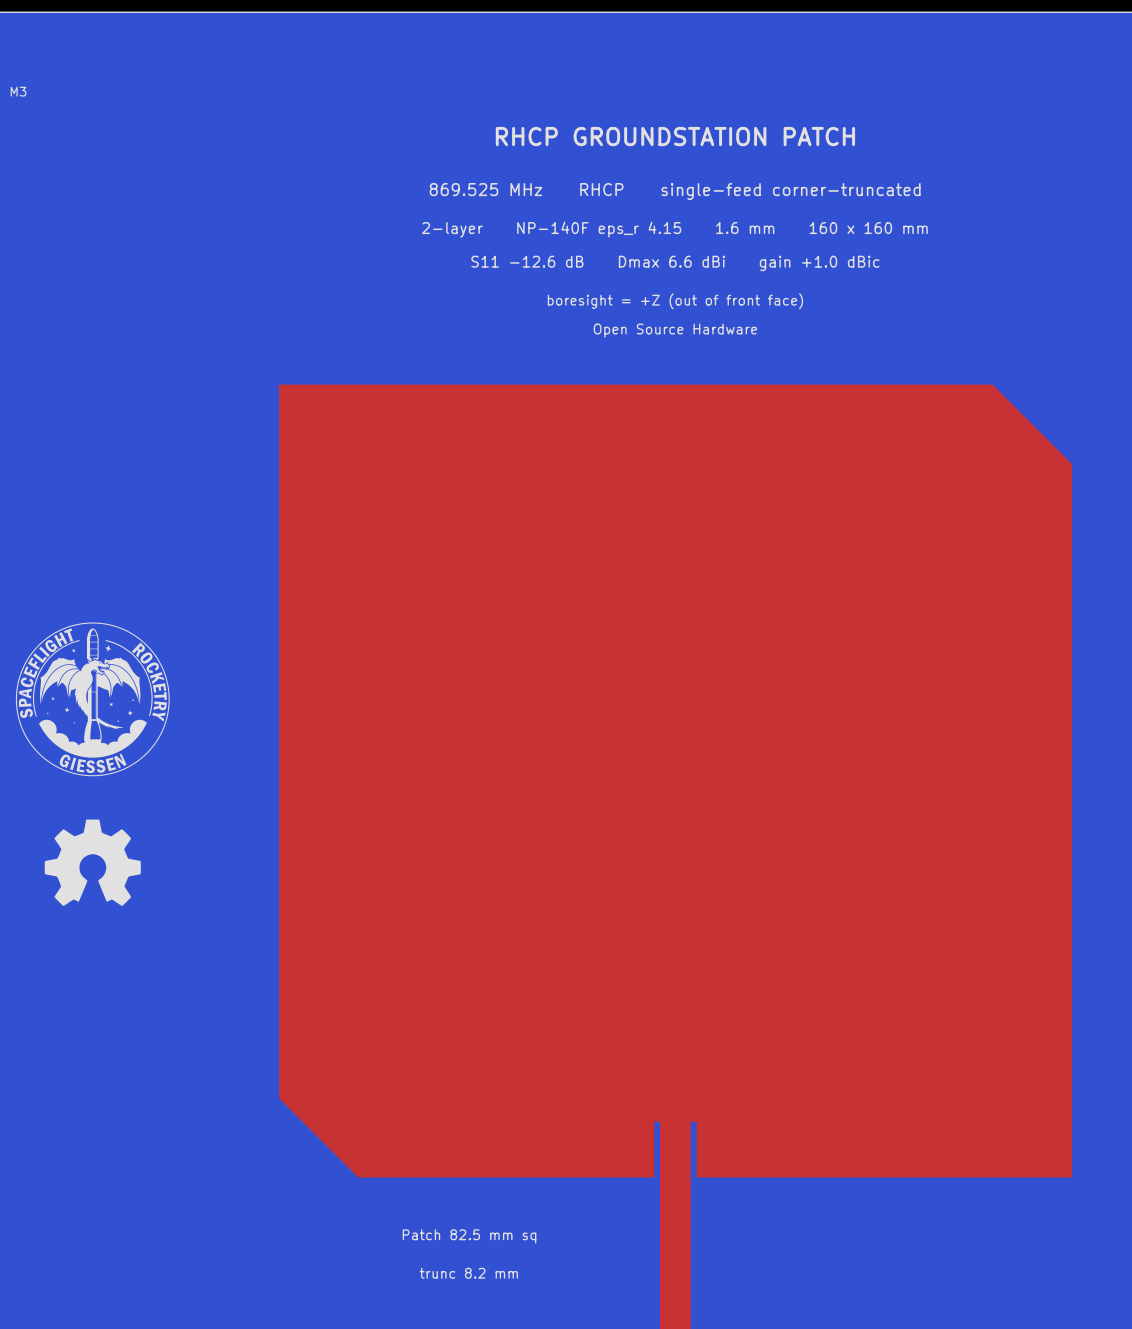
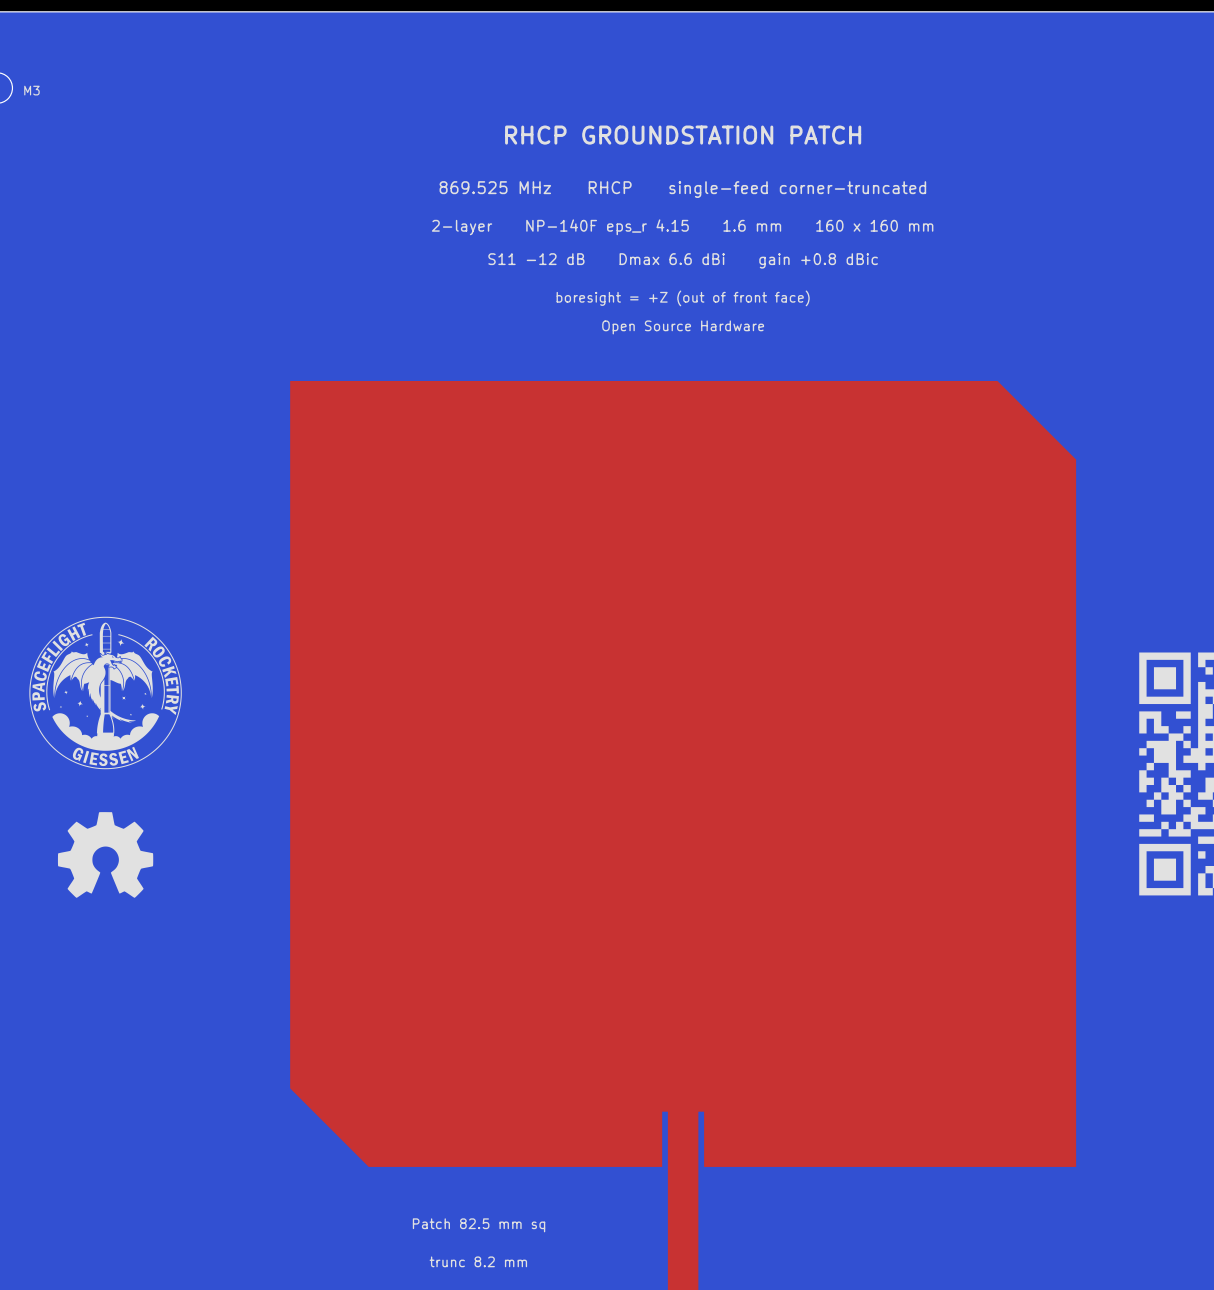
text: S11 -12.6 dB Dmax 6.6 dBi gain +1.0 dBic (675, 263) -> S11 -12 dB Dmax 6.6 dBi gain +0.8 dBic (683, 260)

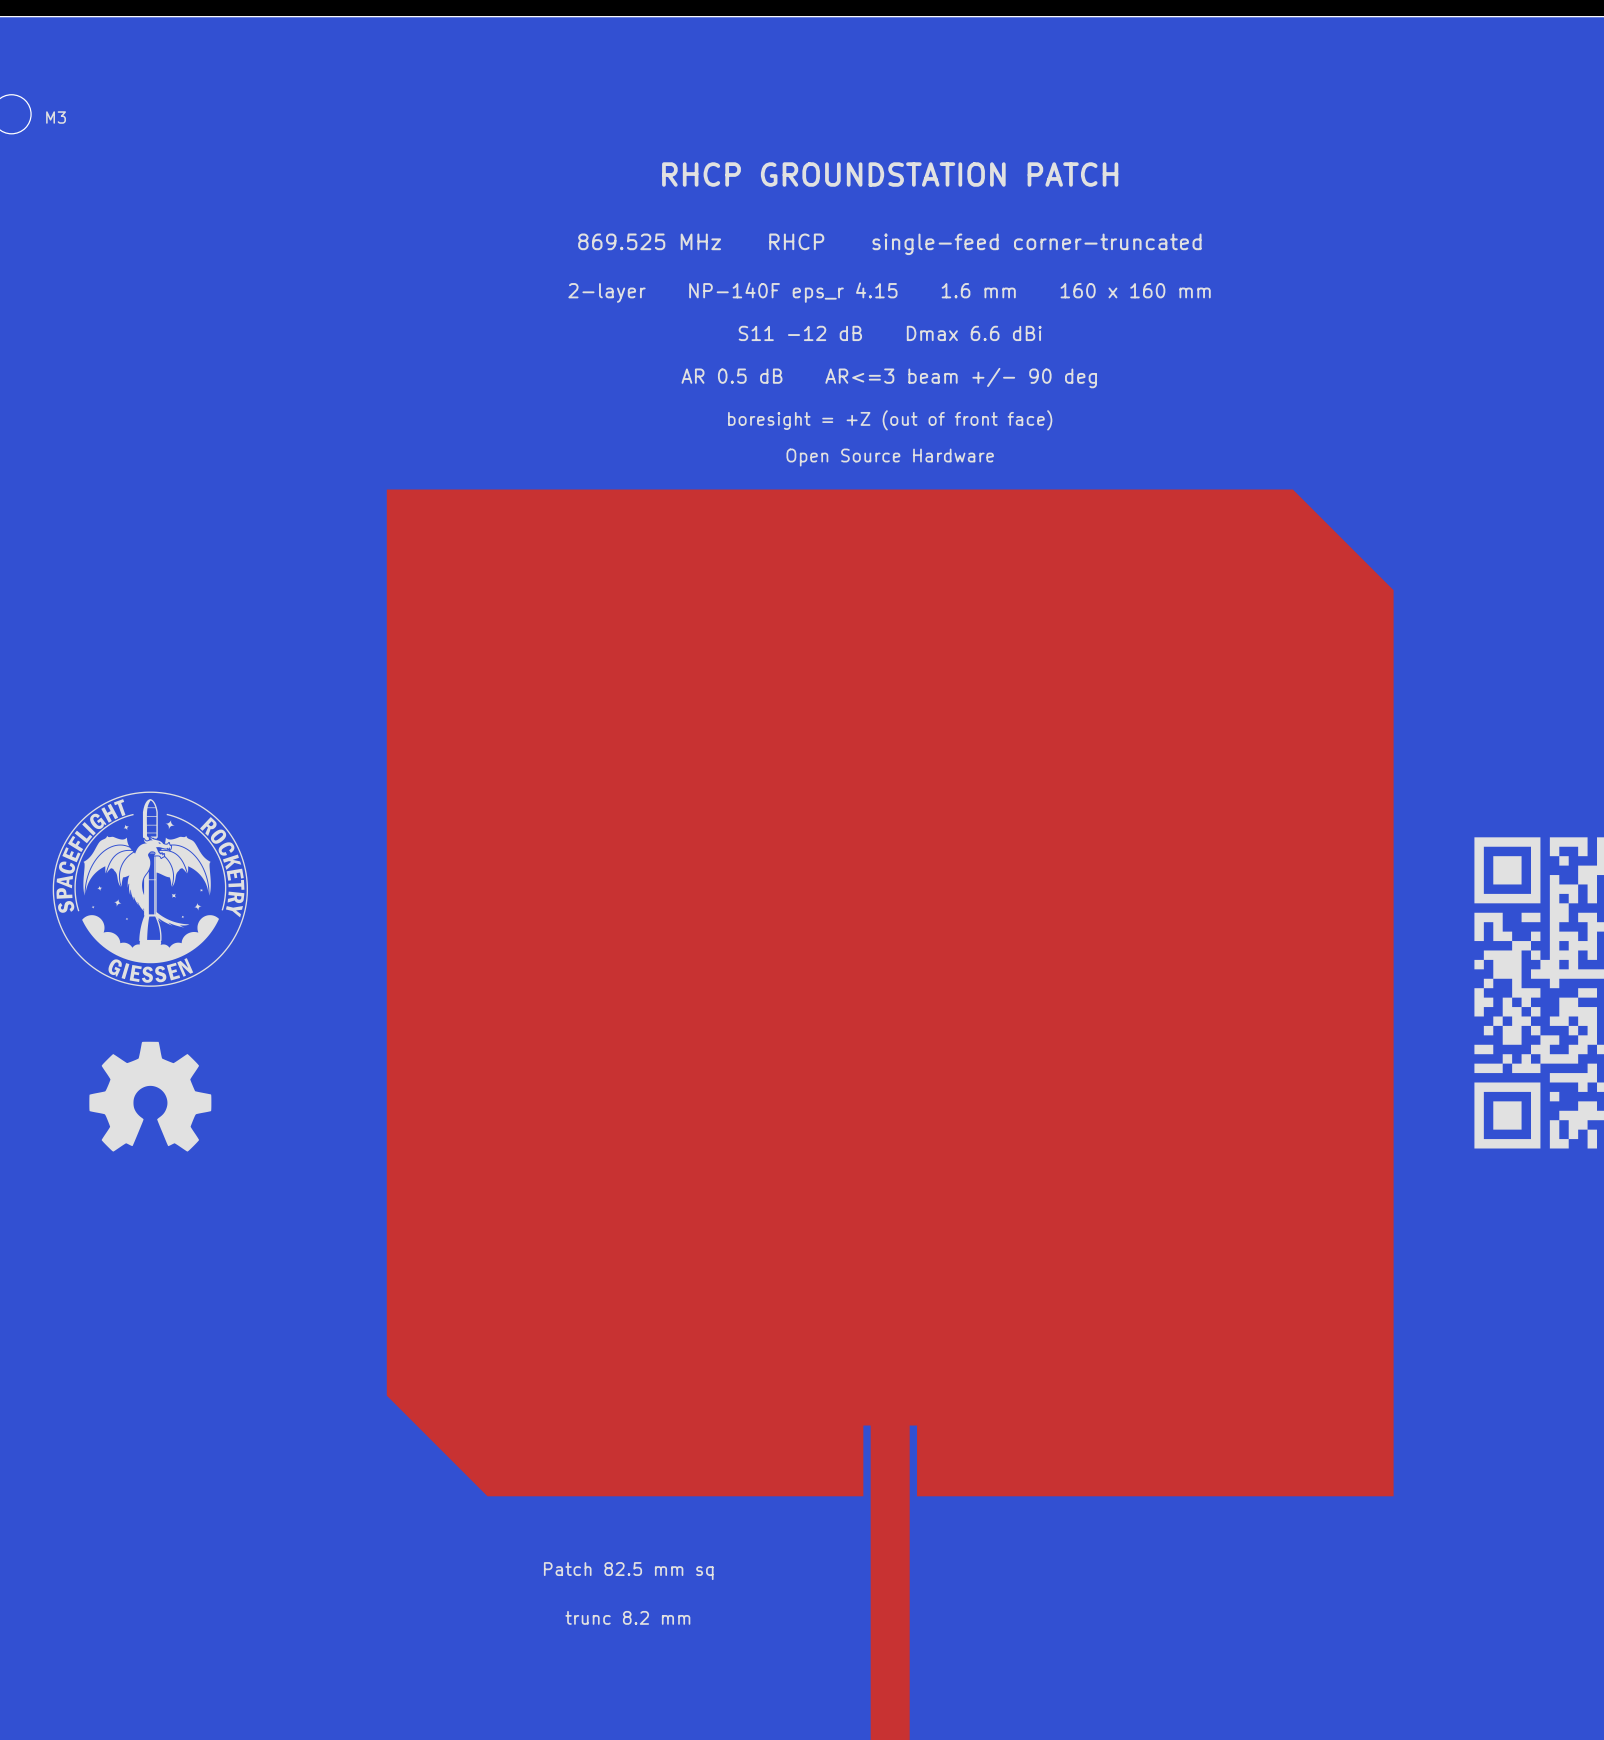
text: S11 -12 dB Dmax 6.6 dBi gain +0.8 dBic (683, 260) -> S11 -12 dB Dmax 6.6 dBi (890, 333)
text: boresight = +Z (out of front face) (683, 298) -> AR 0.5 dB AR<=3 beam +/- 90 deg (889, 378)
text: Open Source Hardware (683, 327) -> boresight = +Z (out of front face) (890, 420)
text: none -> Open Source Hardware (890, 457)

